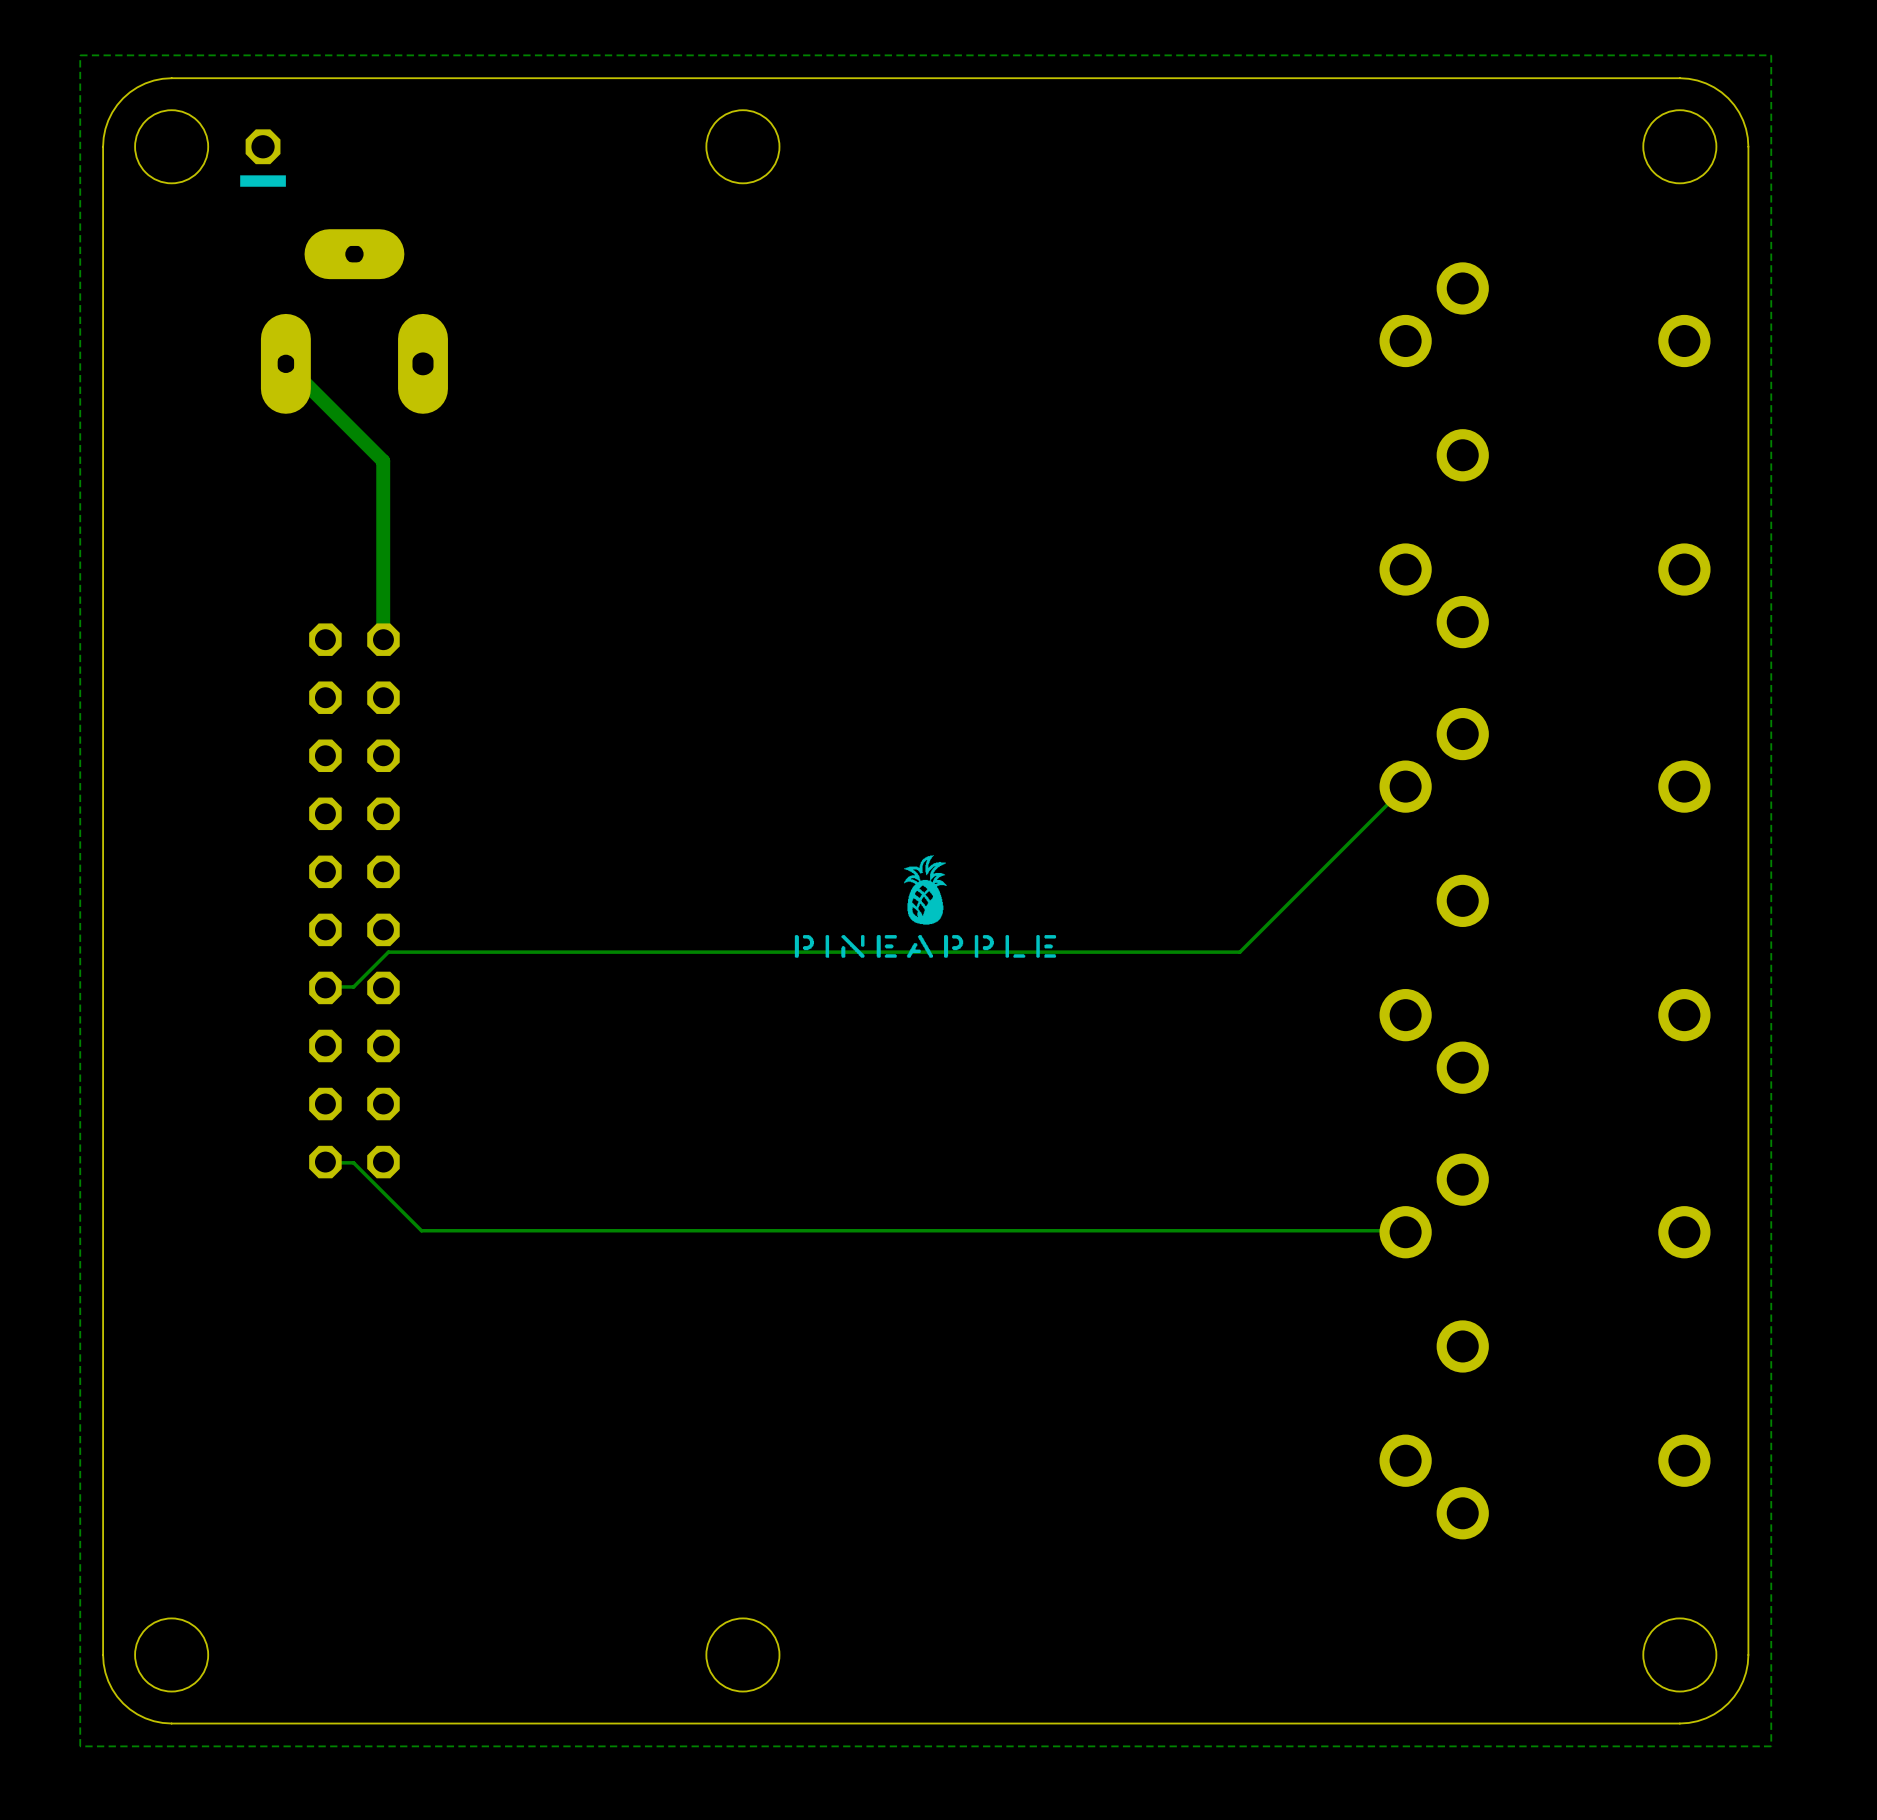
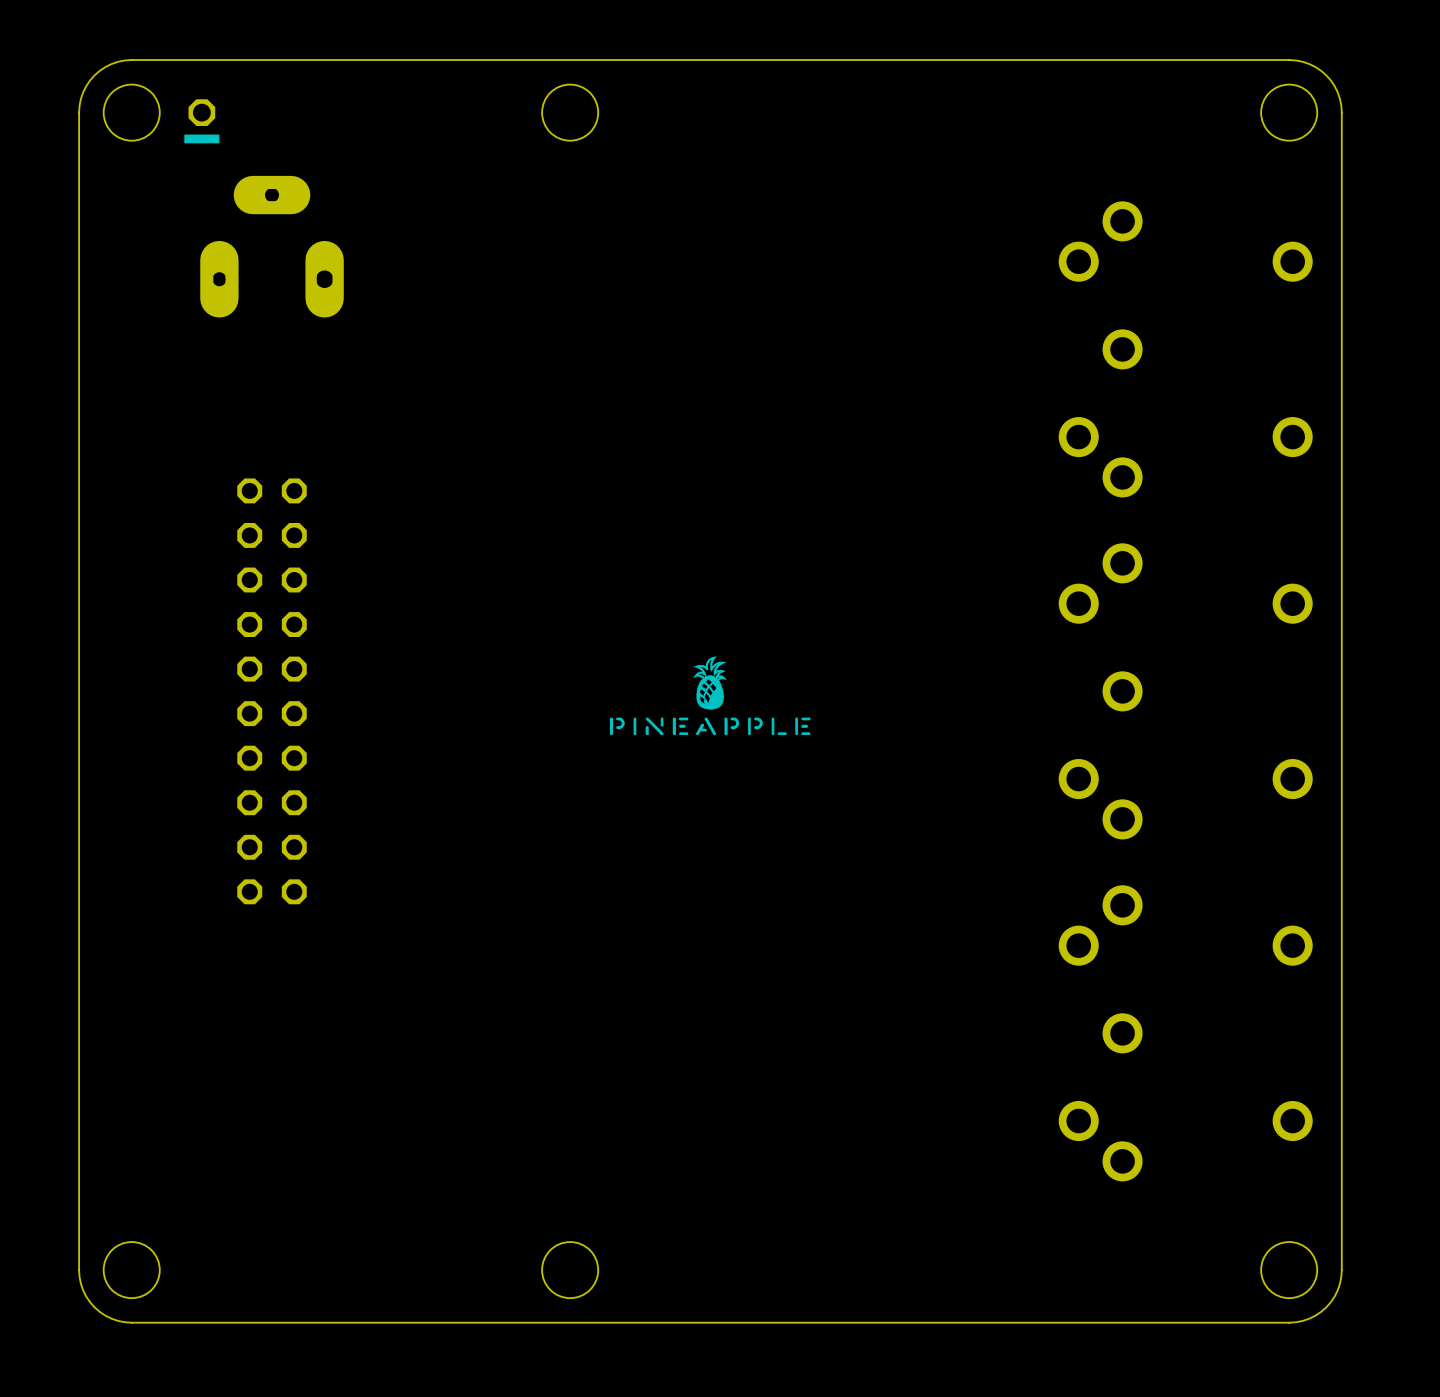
zone outline: (1771, 55) (80, 55) (80, 1746) (1771, 1746) (1771, 55) -> none
track: (285, 363) (383, 461) (383, 639) -> none
track: (1405, 786) (1239, 952) (388, 952) (353, 986) (325, 987) -> none
track: (325, 1162) (353, 1162) (421, 1230) (1405, 1232) -> none

